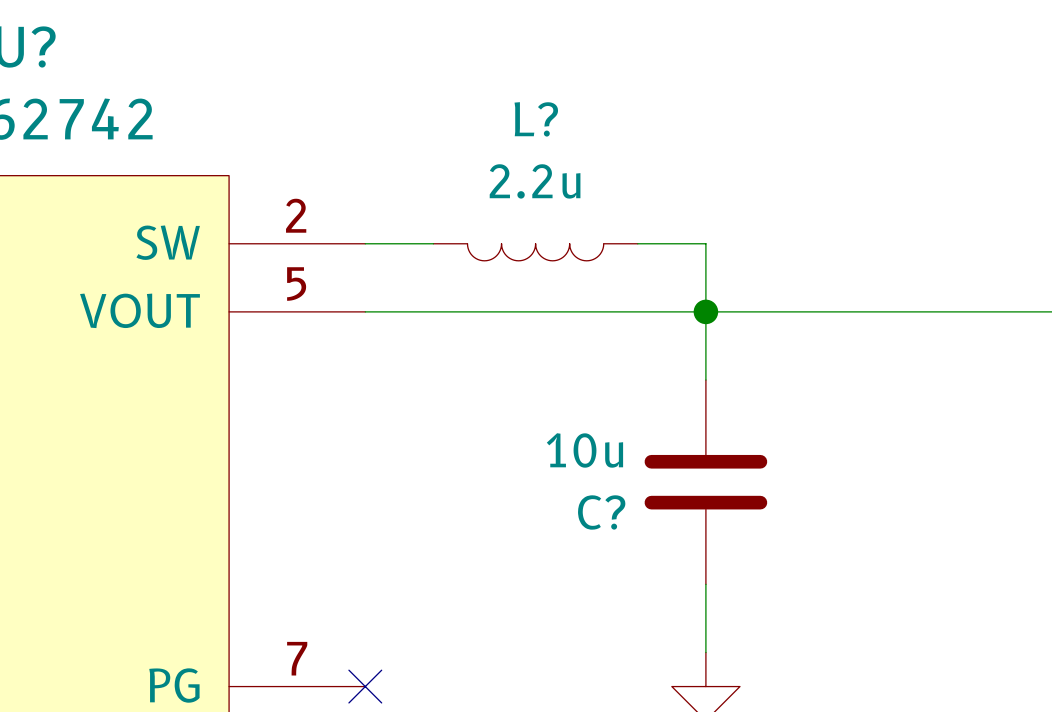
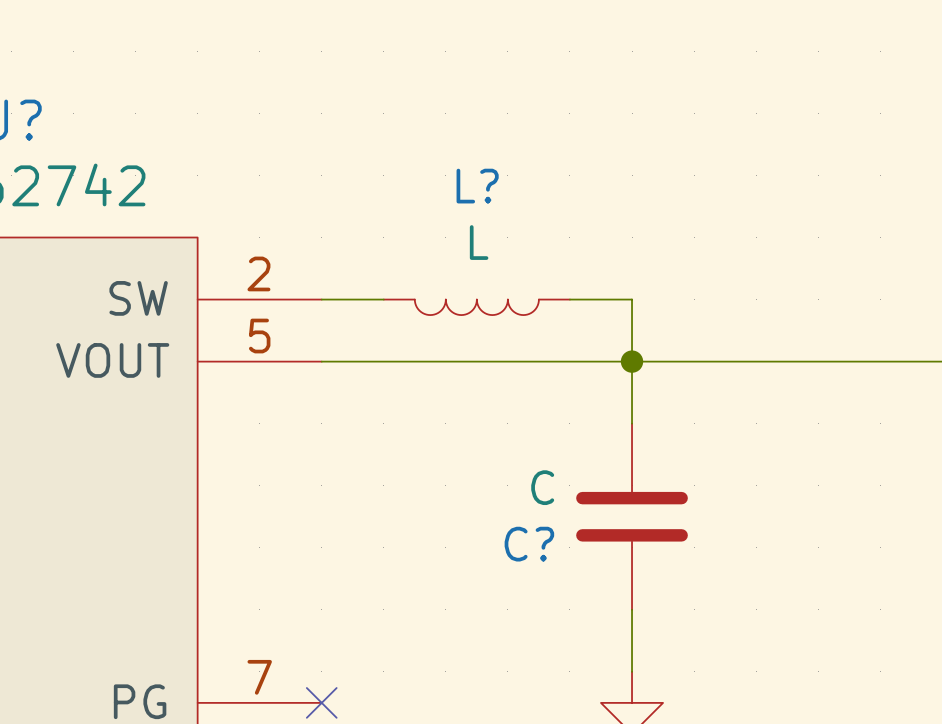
L? value: 2.2u (535, 181) -> L (479, 242)
C? value: 10u (584, 450) -> C (542, 487)

